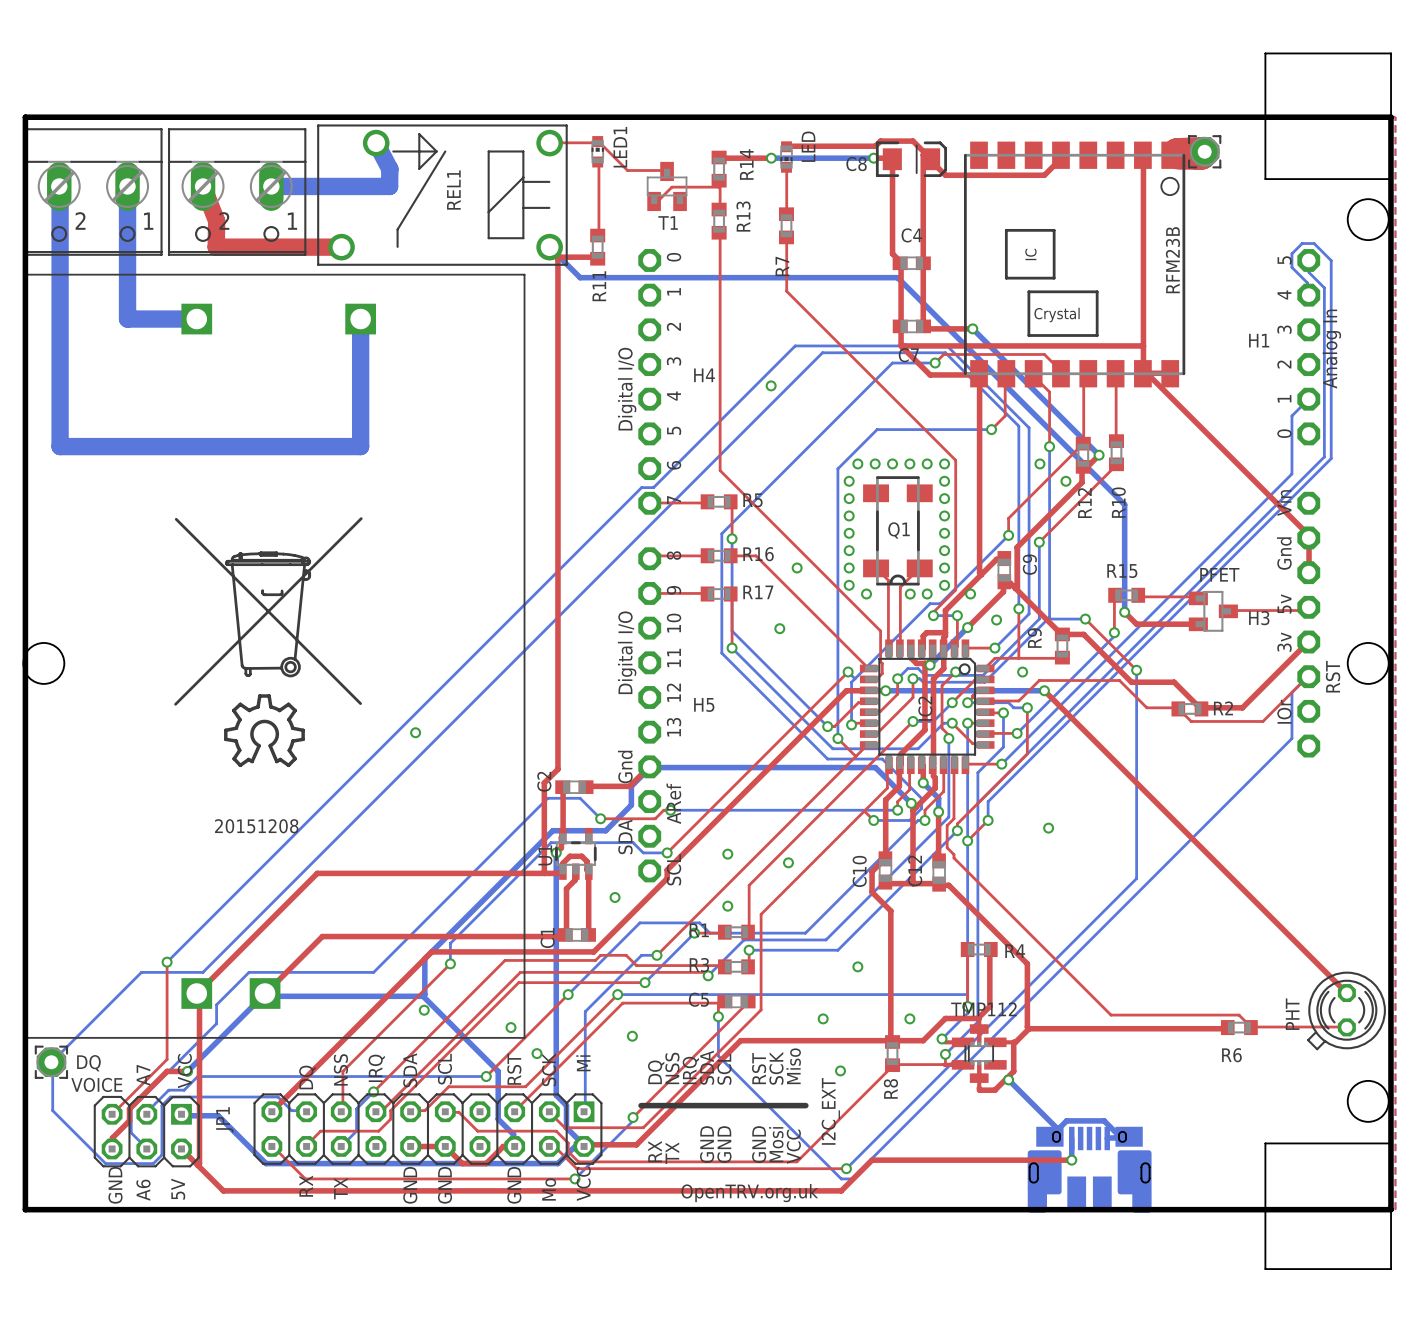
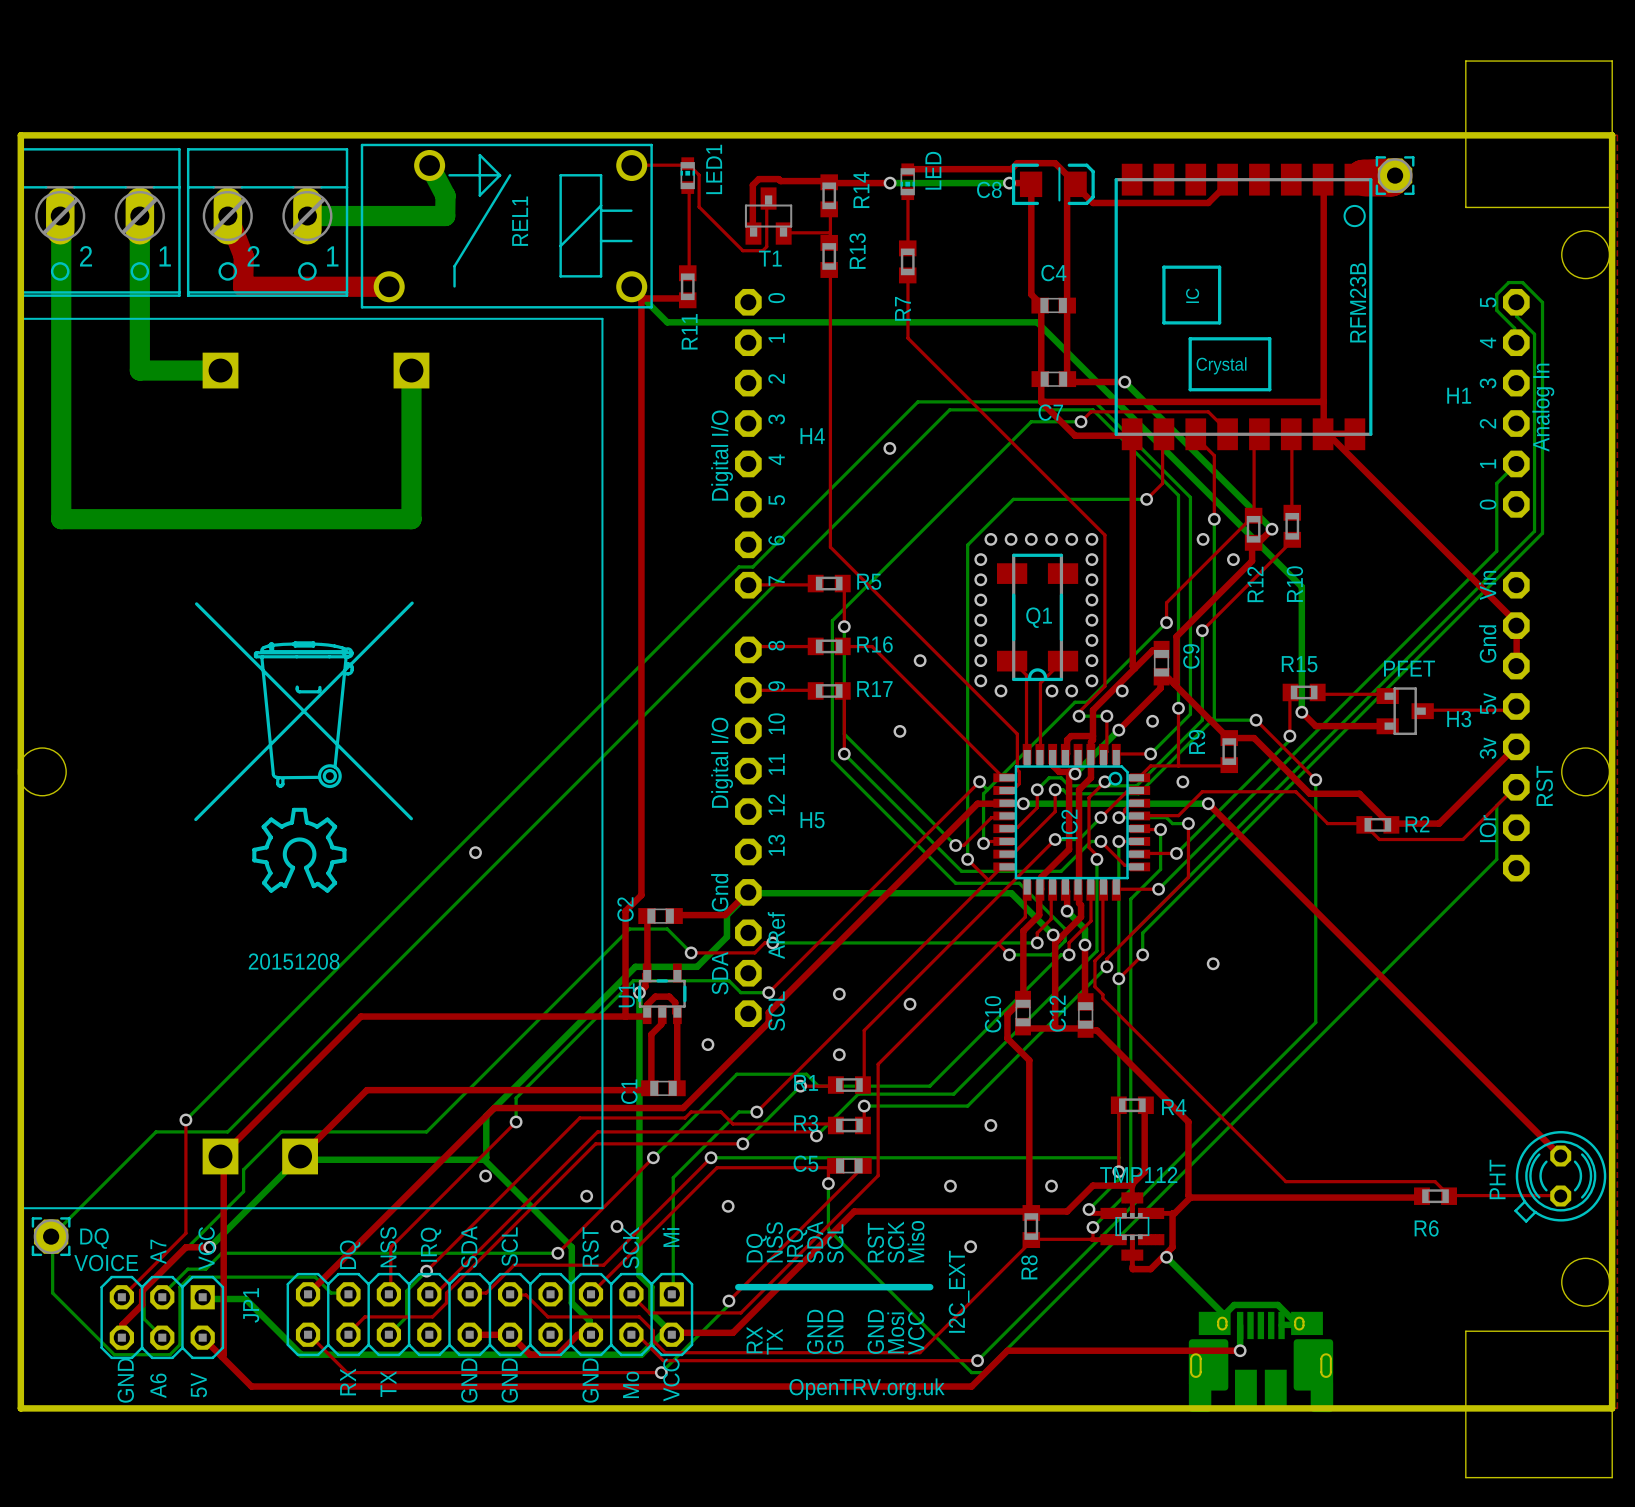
top track: (597, 141) (627, 170) (667, 171) -> (689, 165) (699, 175) (699, 206) (742, 250) (762, 250) (766, 246) (766, 199) (768, 198)
top track: (719, 180) (719, 187) (671, 187) (658, 201) (654, 201) -> (828, 181) (758, 179) (752, 185) (753, 233)
top track: none -> (830, 232) (783, 233)

